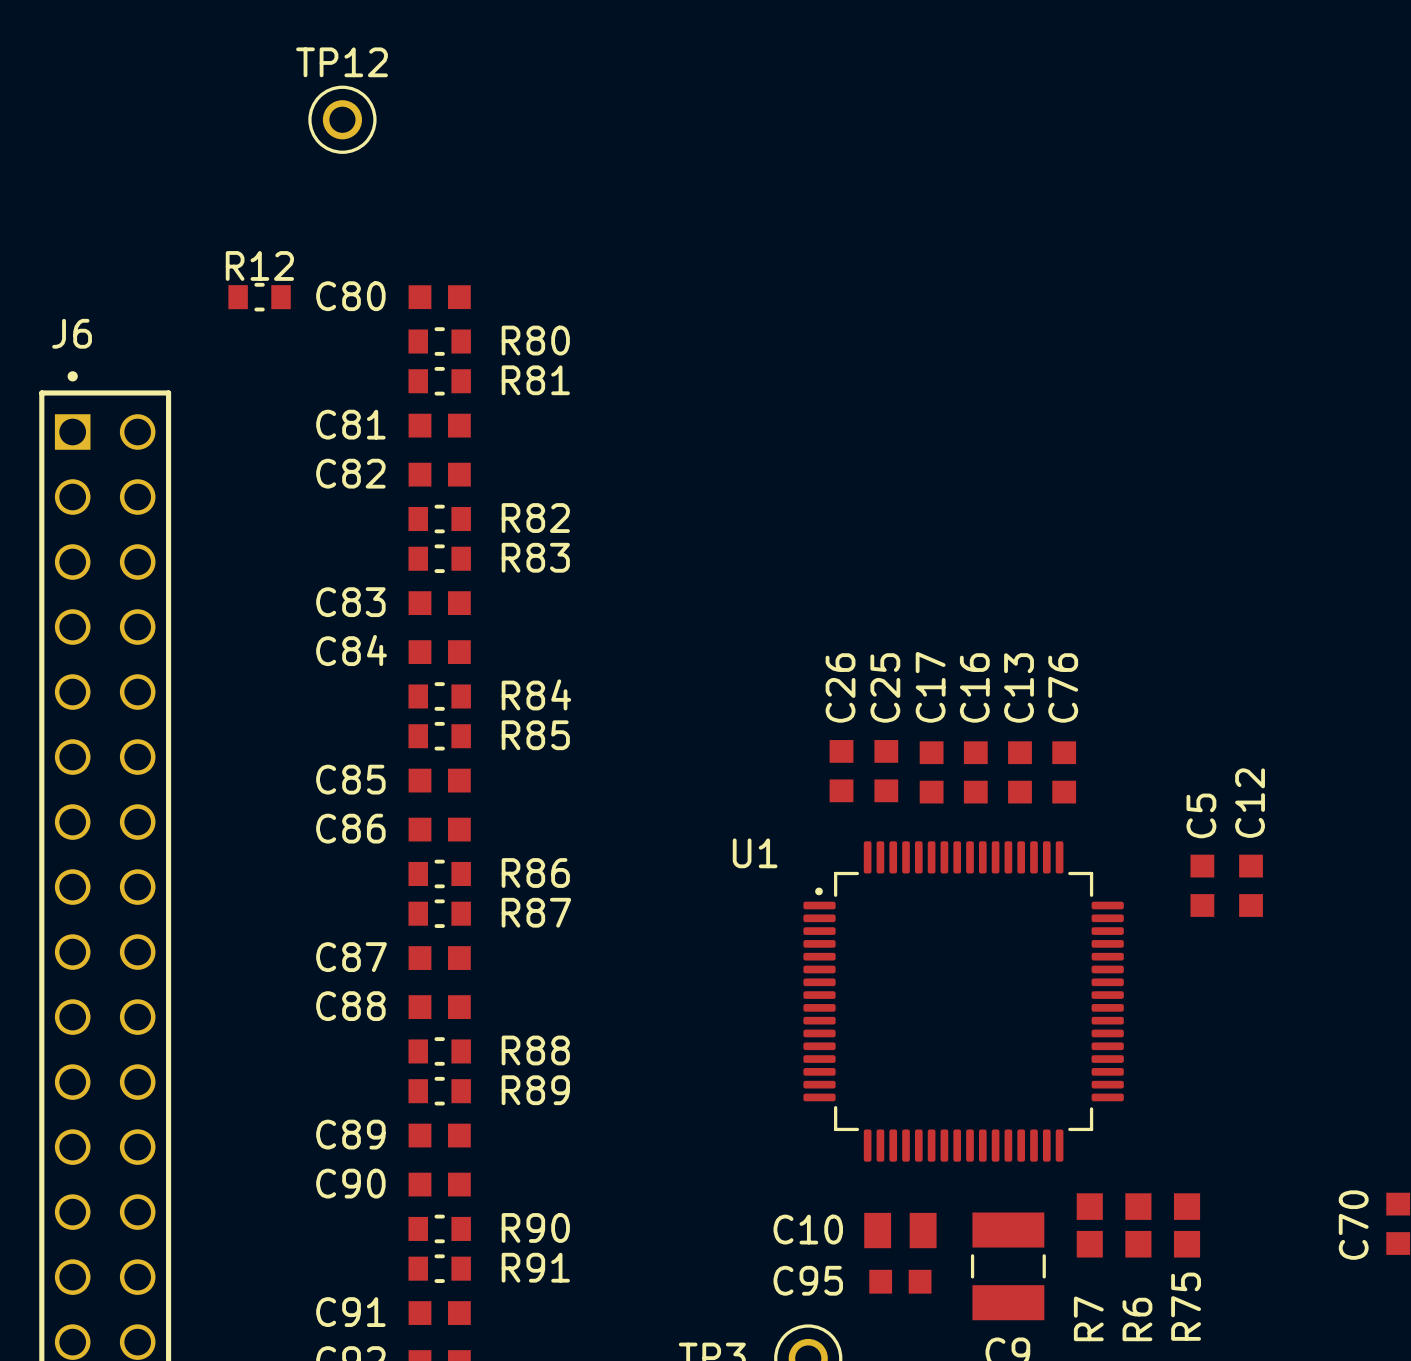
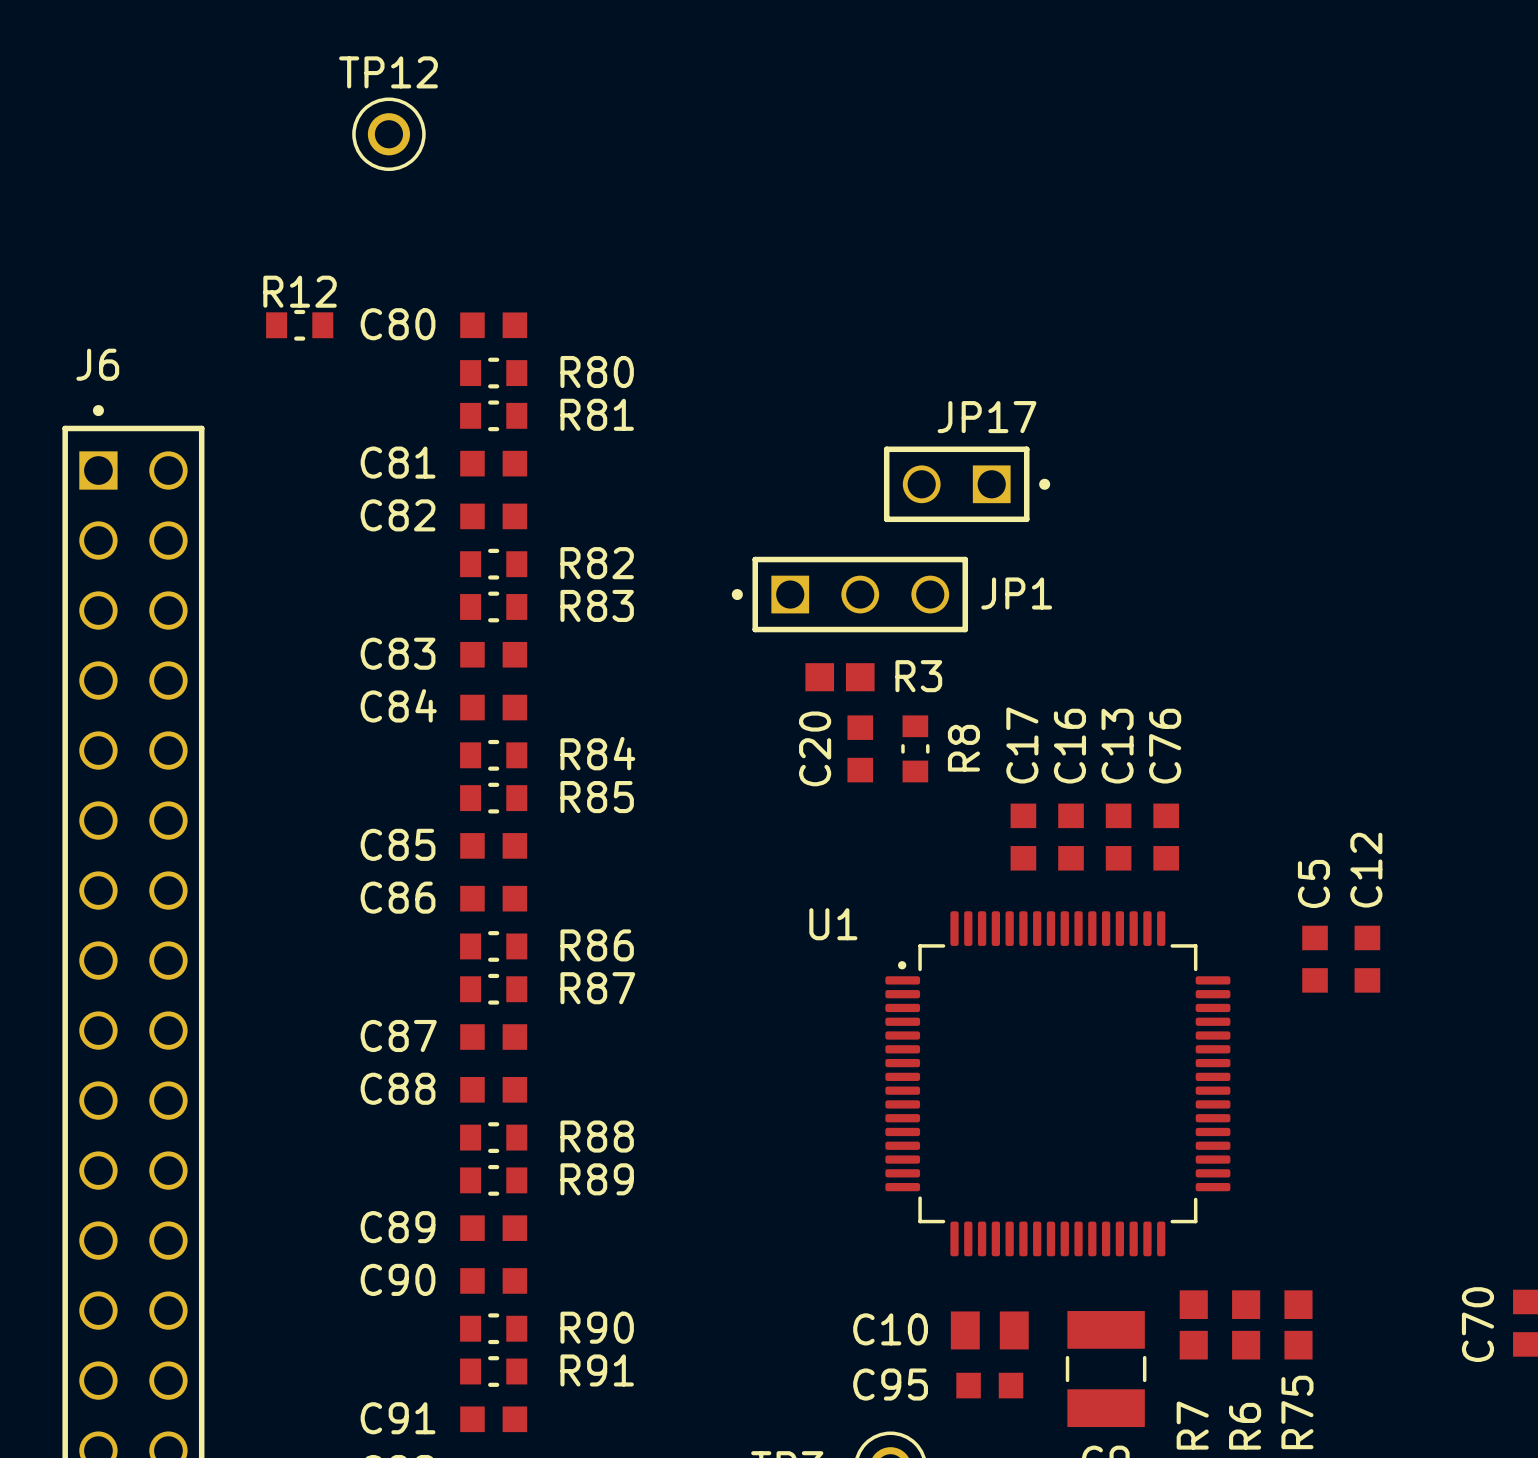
JP17: none -> (967, 484)
JP1: none -> (849, 594)
R3: none -> (840, 677)
C20: none -> (860, 748)
R8: none -> (915, 748)
C26: (841, 771) -> none
C25: (886, 771) -> none

